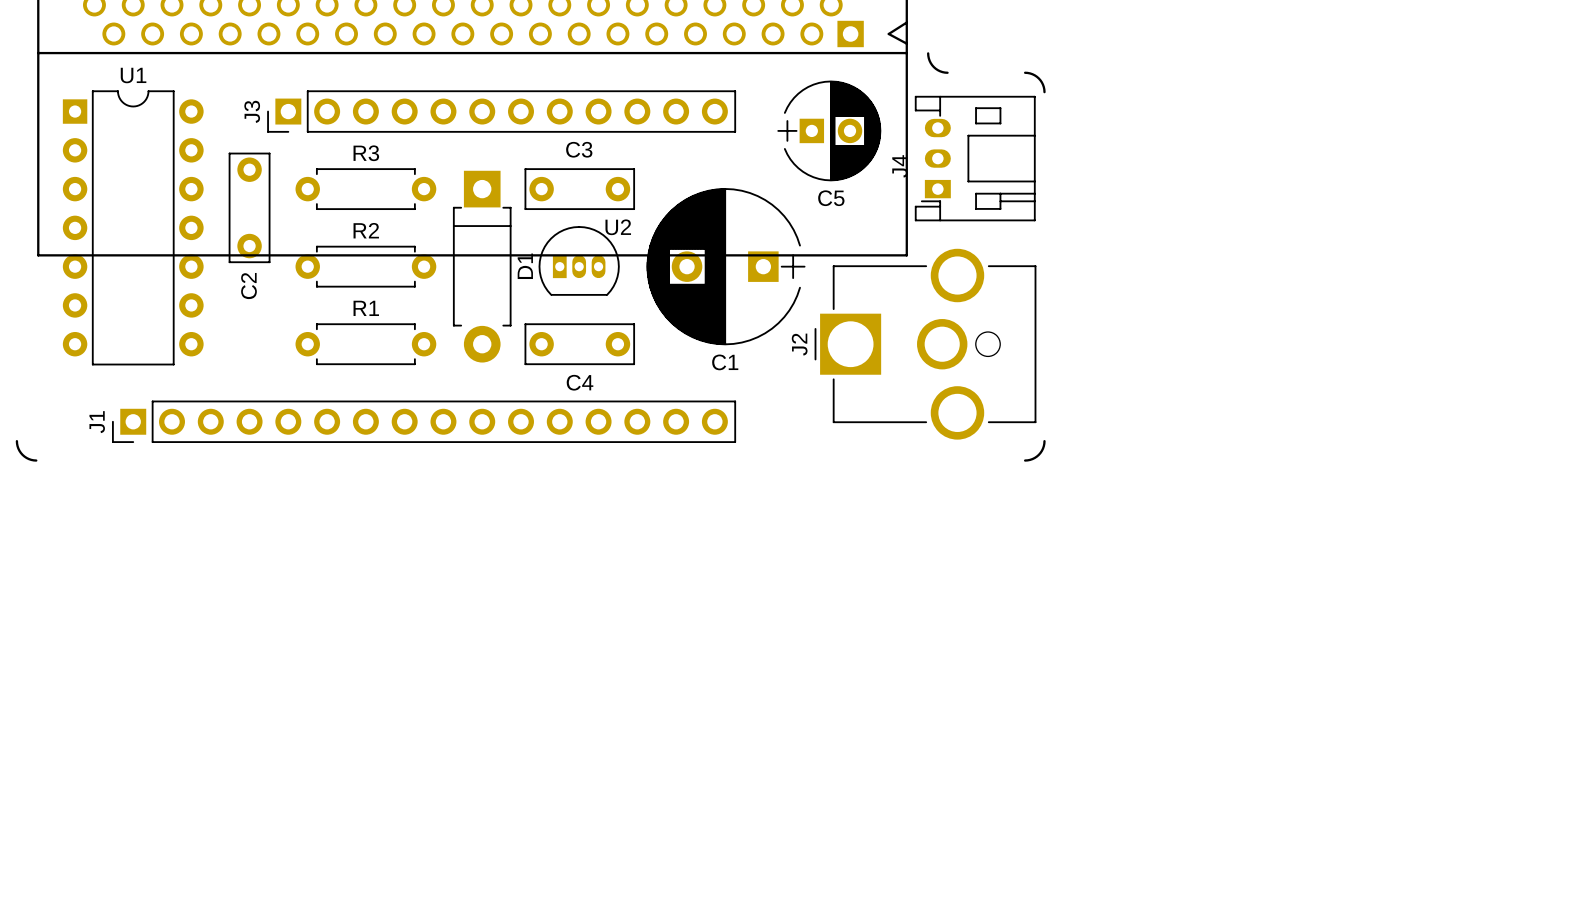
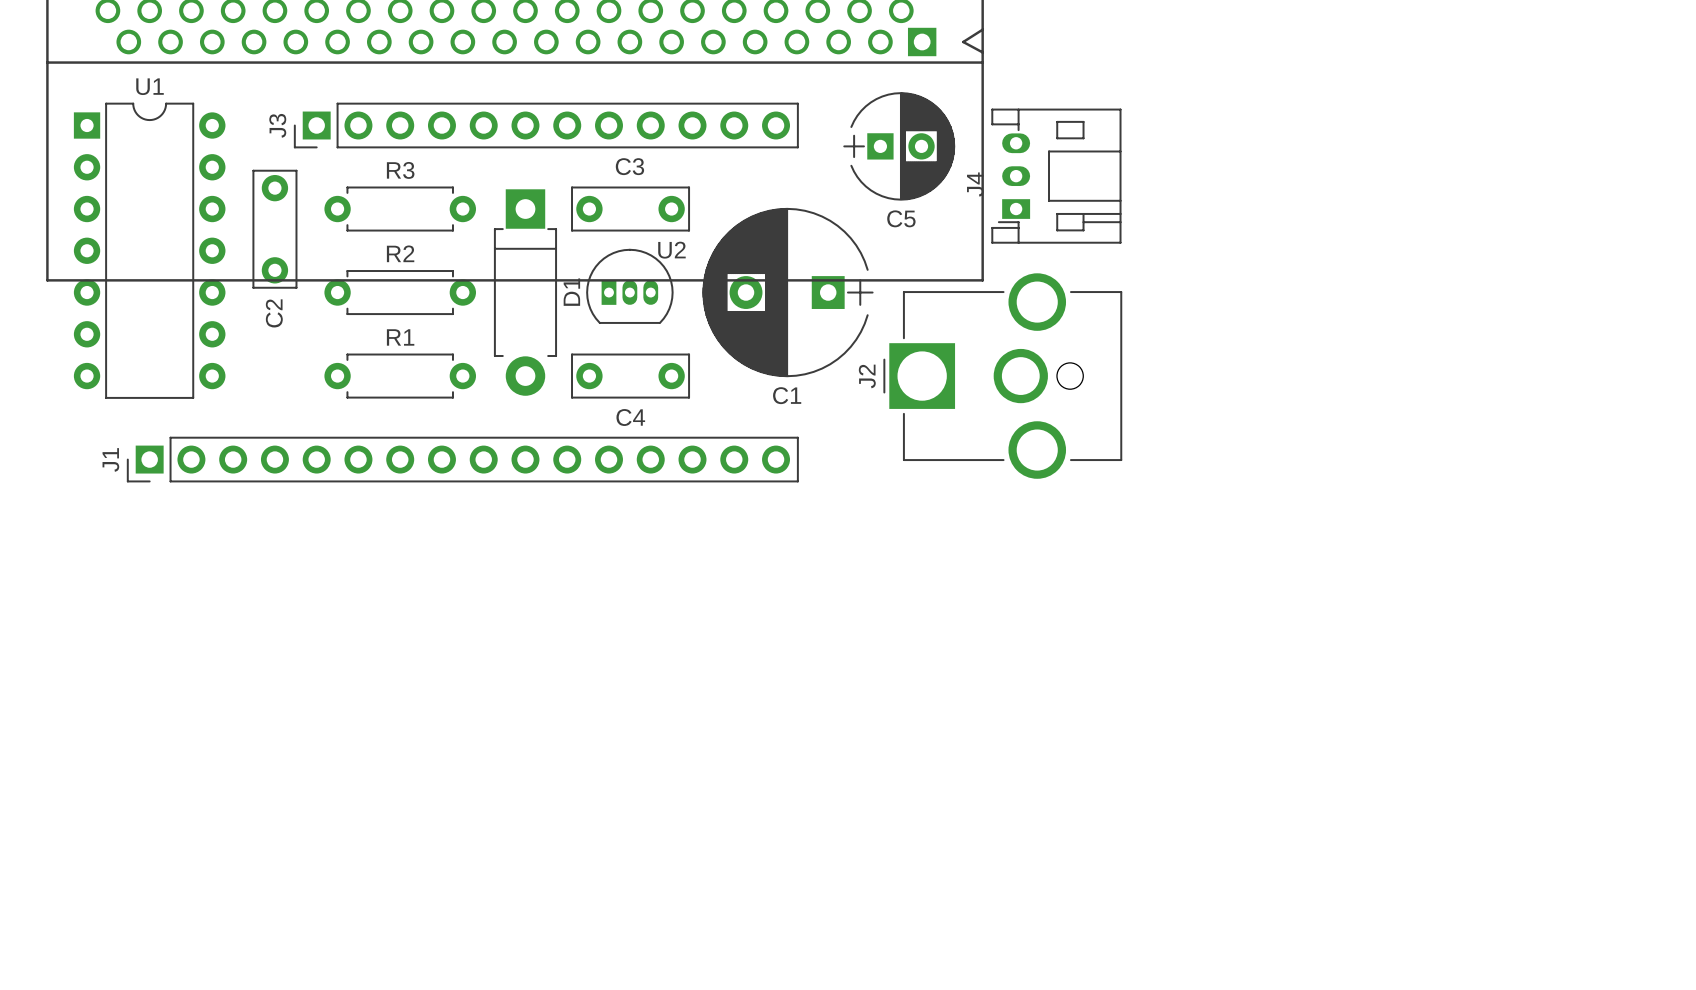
board edge: (928, 53) (933, 67) (947, 72) -> none
board edge: (1025, 72) (1038, 78) (1044, 92) -> none
board edge: (16, 441) (22, 454) (36, 460) -> none
board edge: (1044, 441) (1038, 454) (1025, 460) -> none

